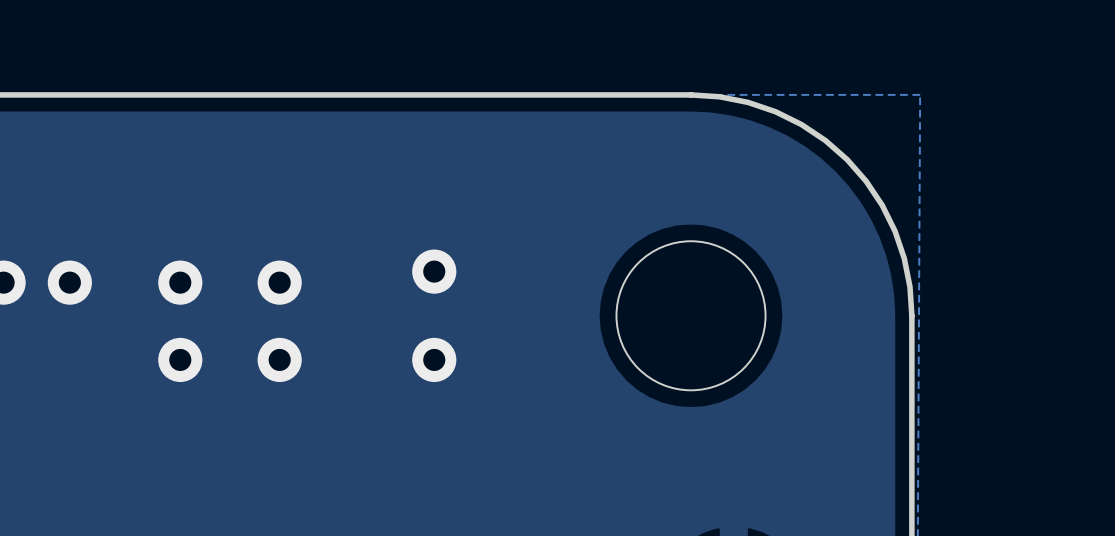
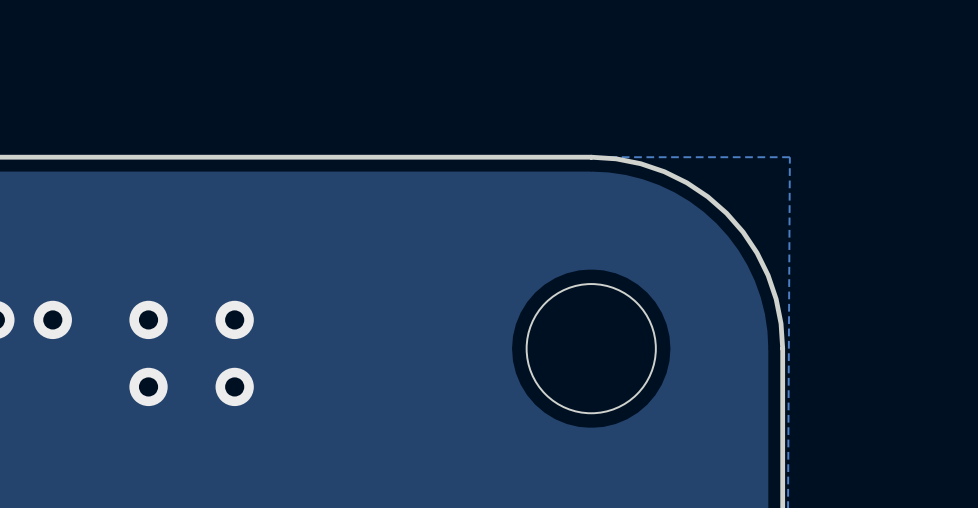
via: (434, 271) -> none
via: (434, 359) -> none

